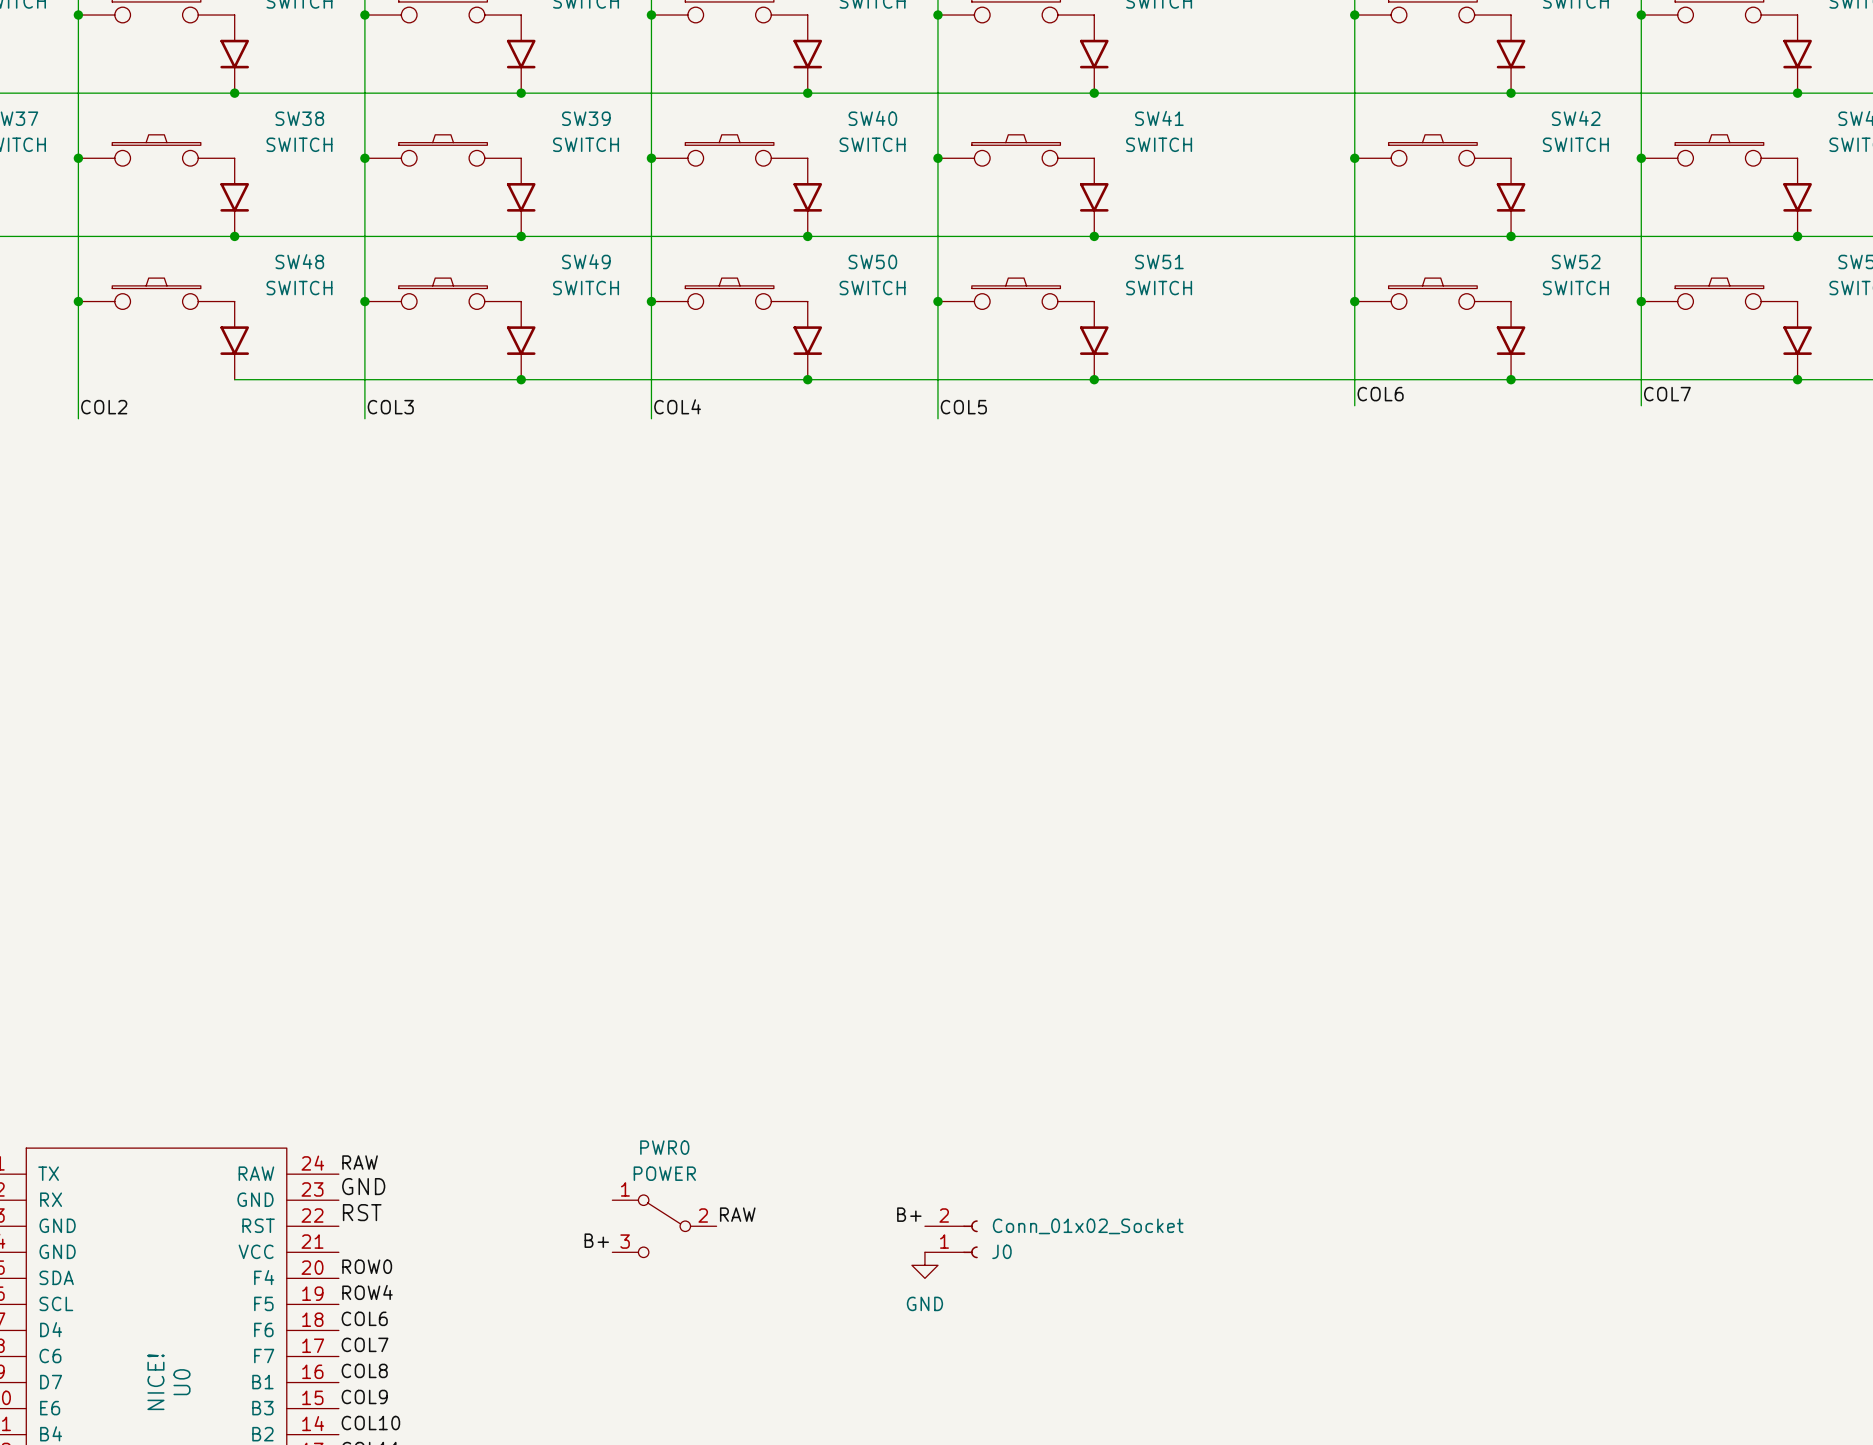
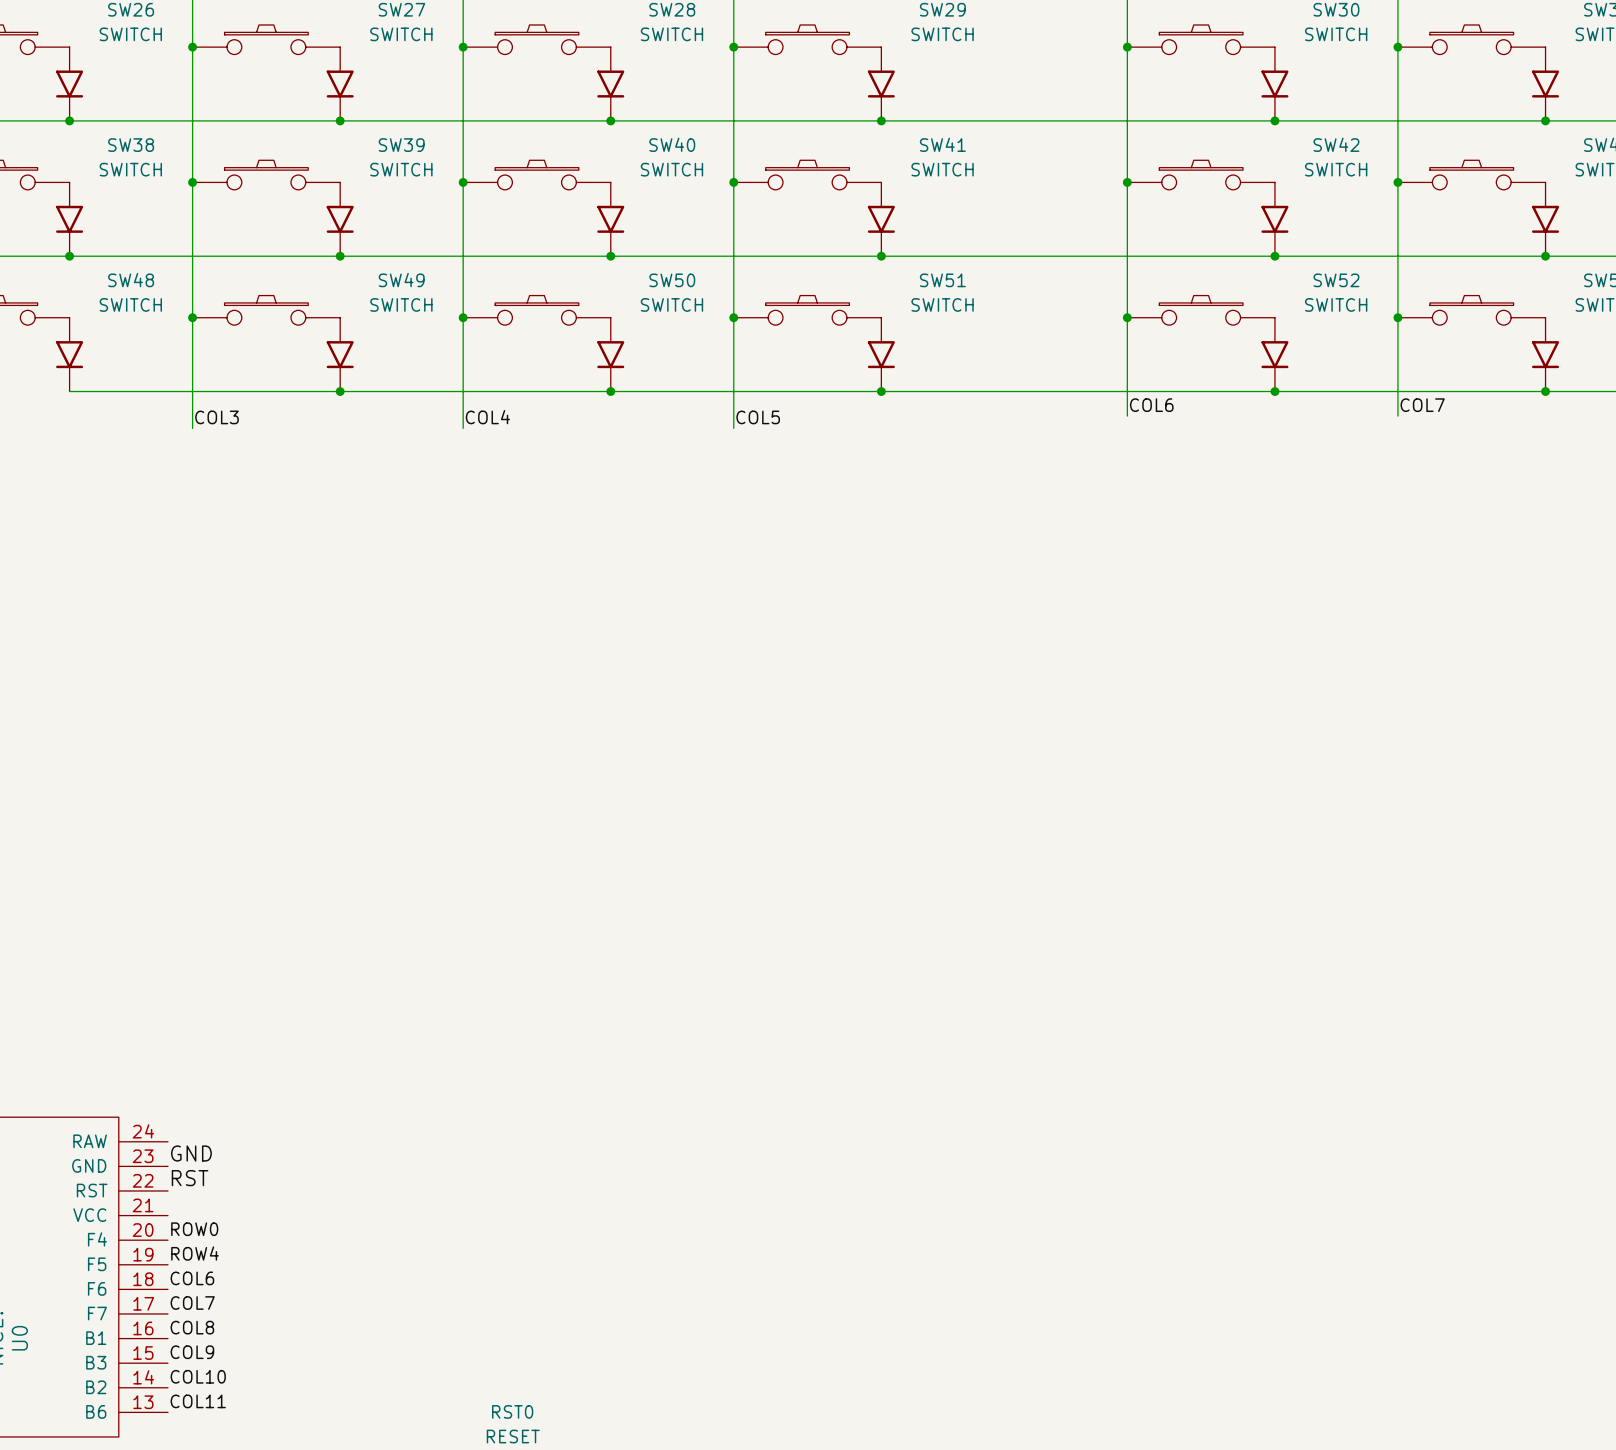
label: RAW (360, 1162) -> none
label: RAW (737, 1214) -> none
label: B+ (909, 1214) -> none
PWR0: POWER (664, 1226) -> none
J0: Conn_01x02_Socket (951, 1239) -> none
label: B+ (596, 1240) -> none
power symbol: GND (924, 1265) -> none

